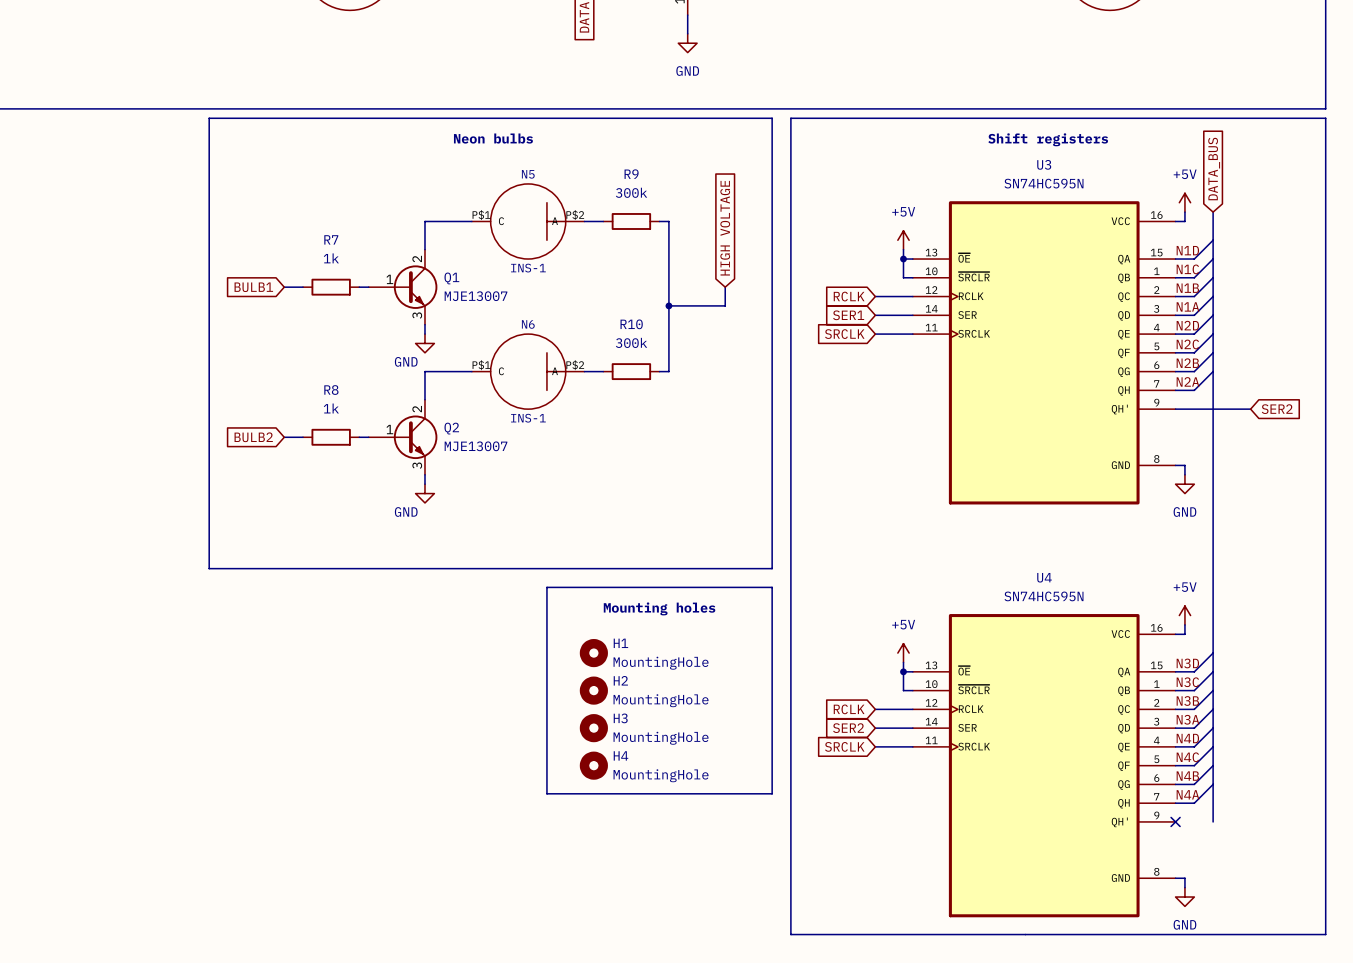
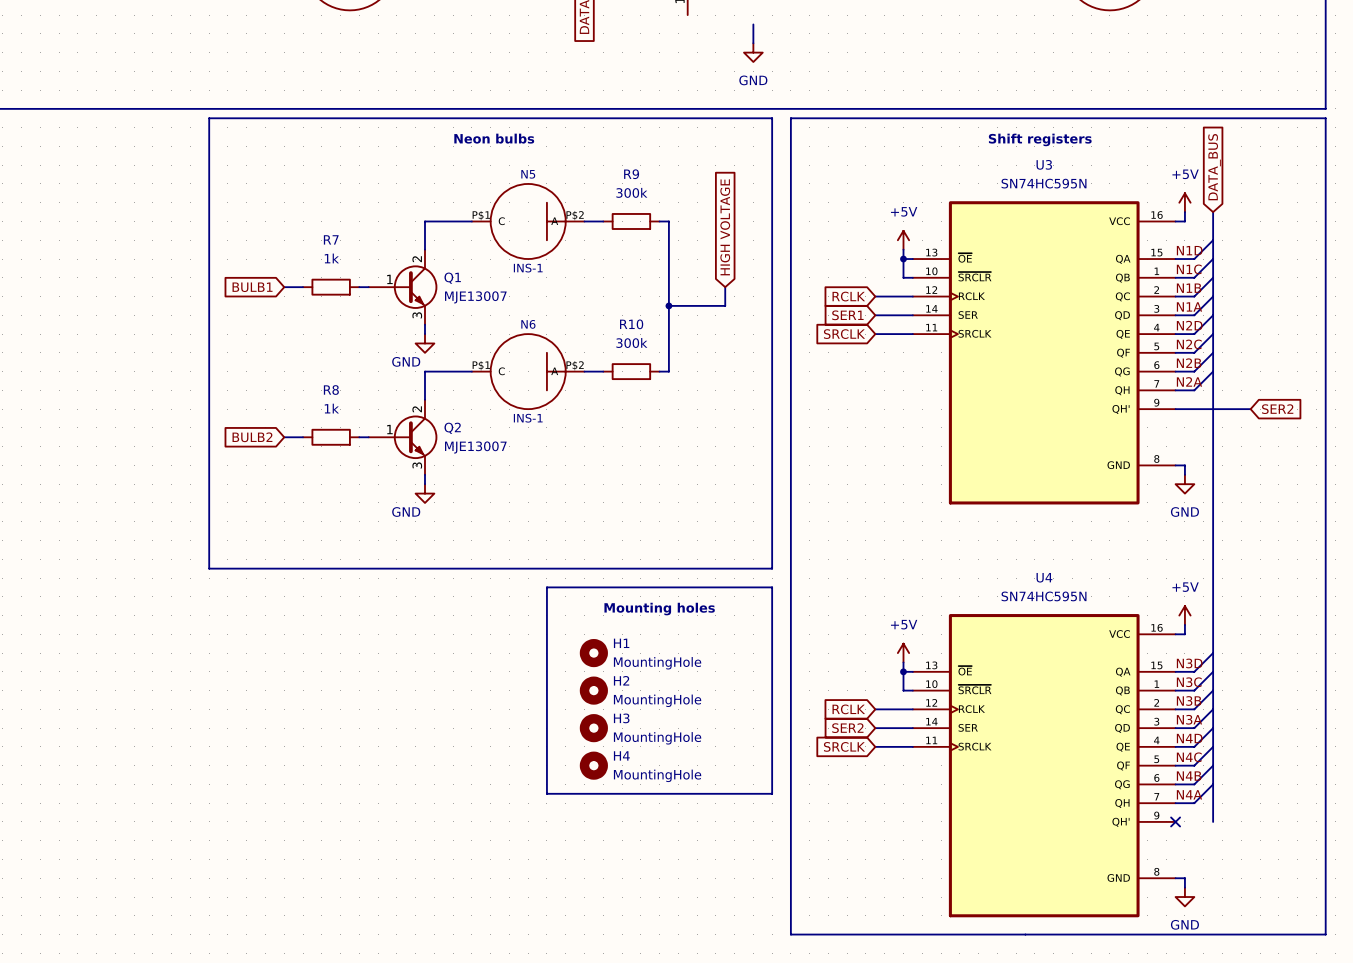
wire: (687, 15) (687, 33) -> (753, 24) (753, 43)
power symbol position: GND (687, 43) -> GND (753, 52)

